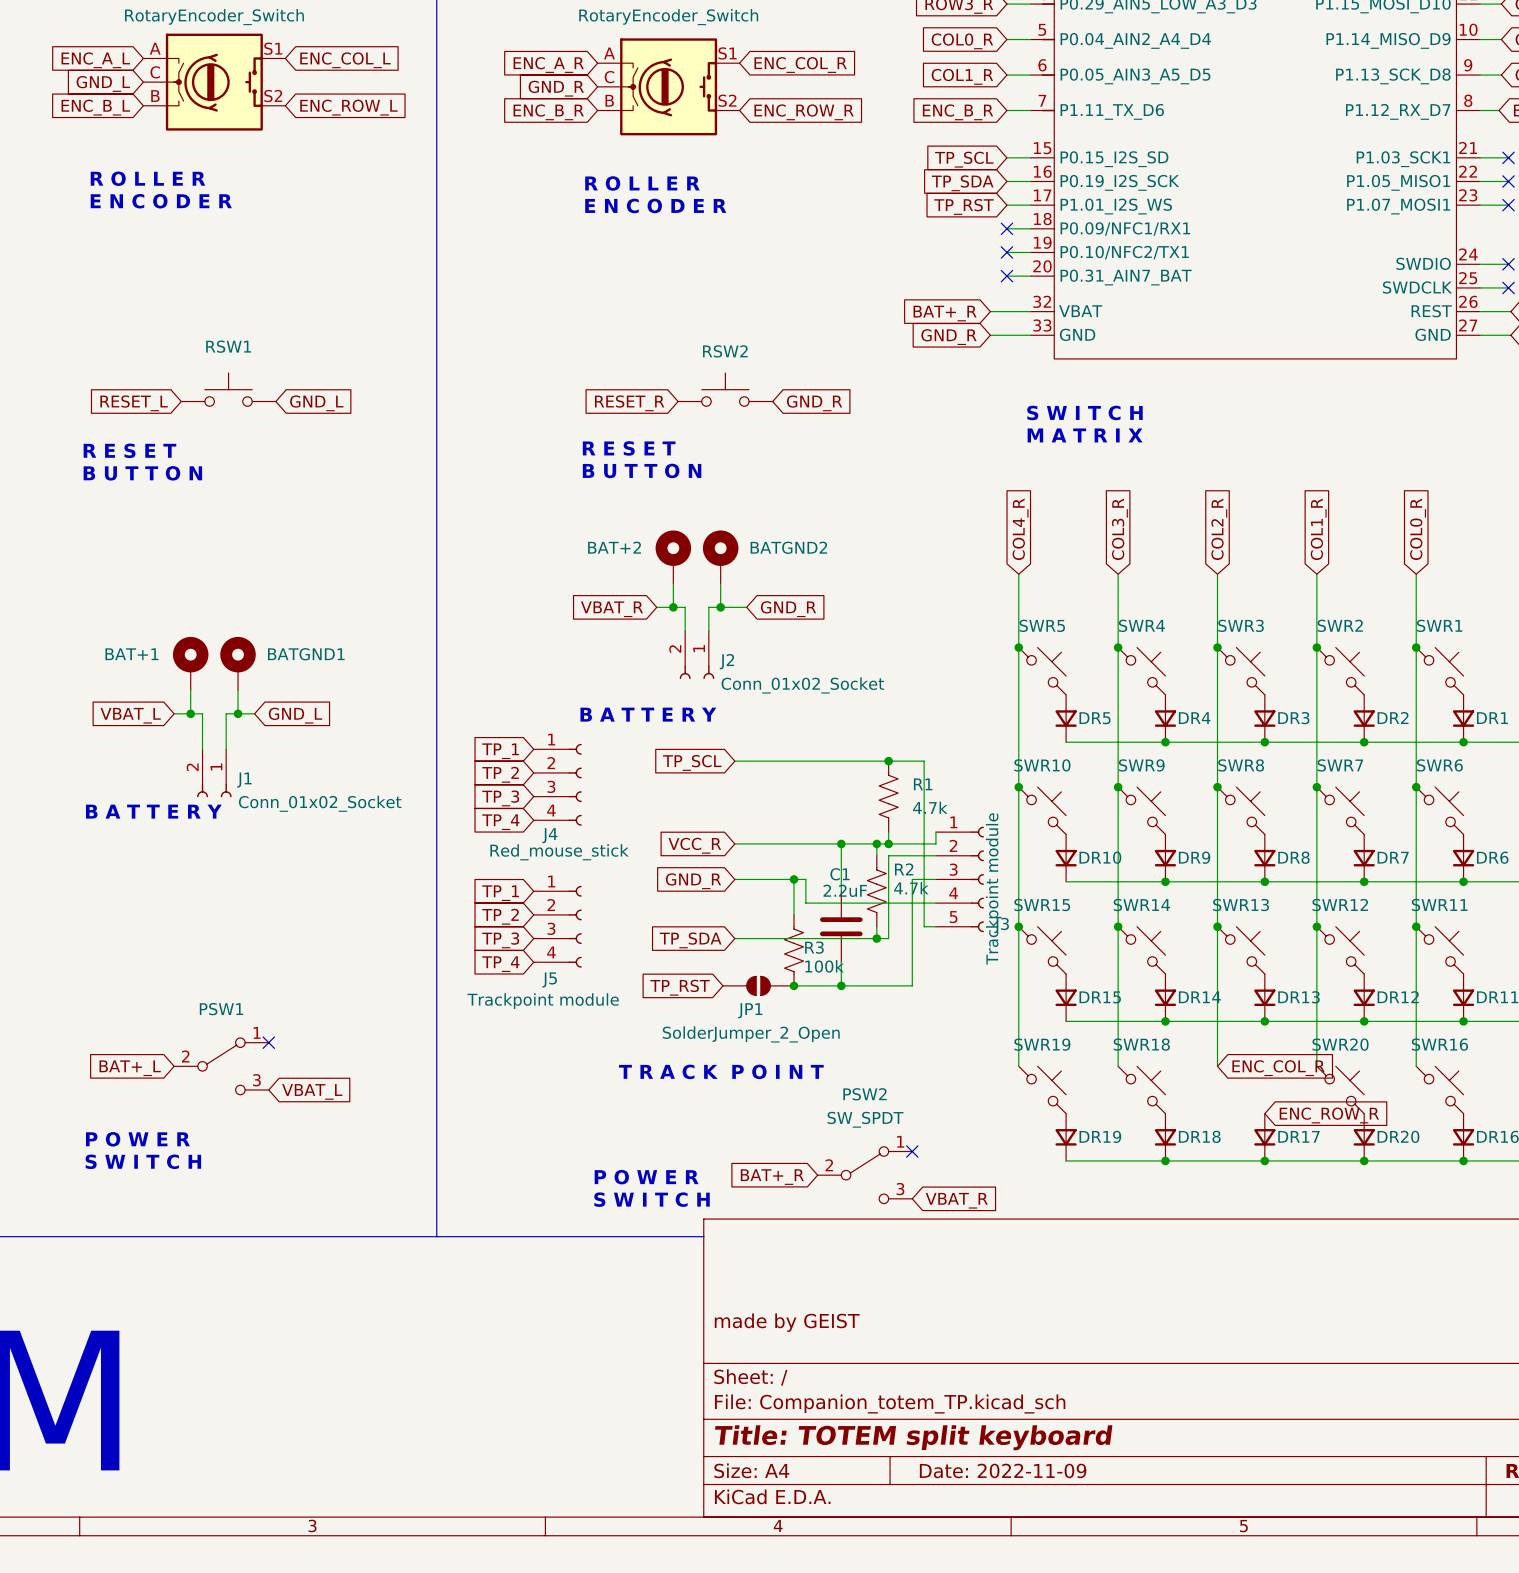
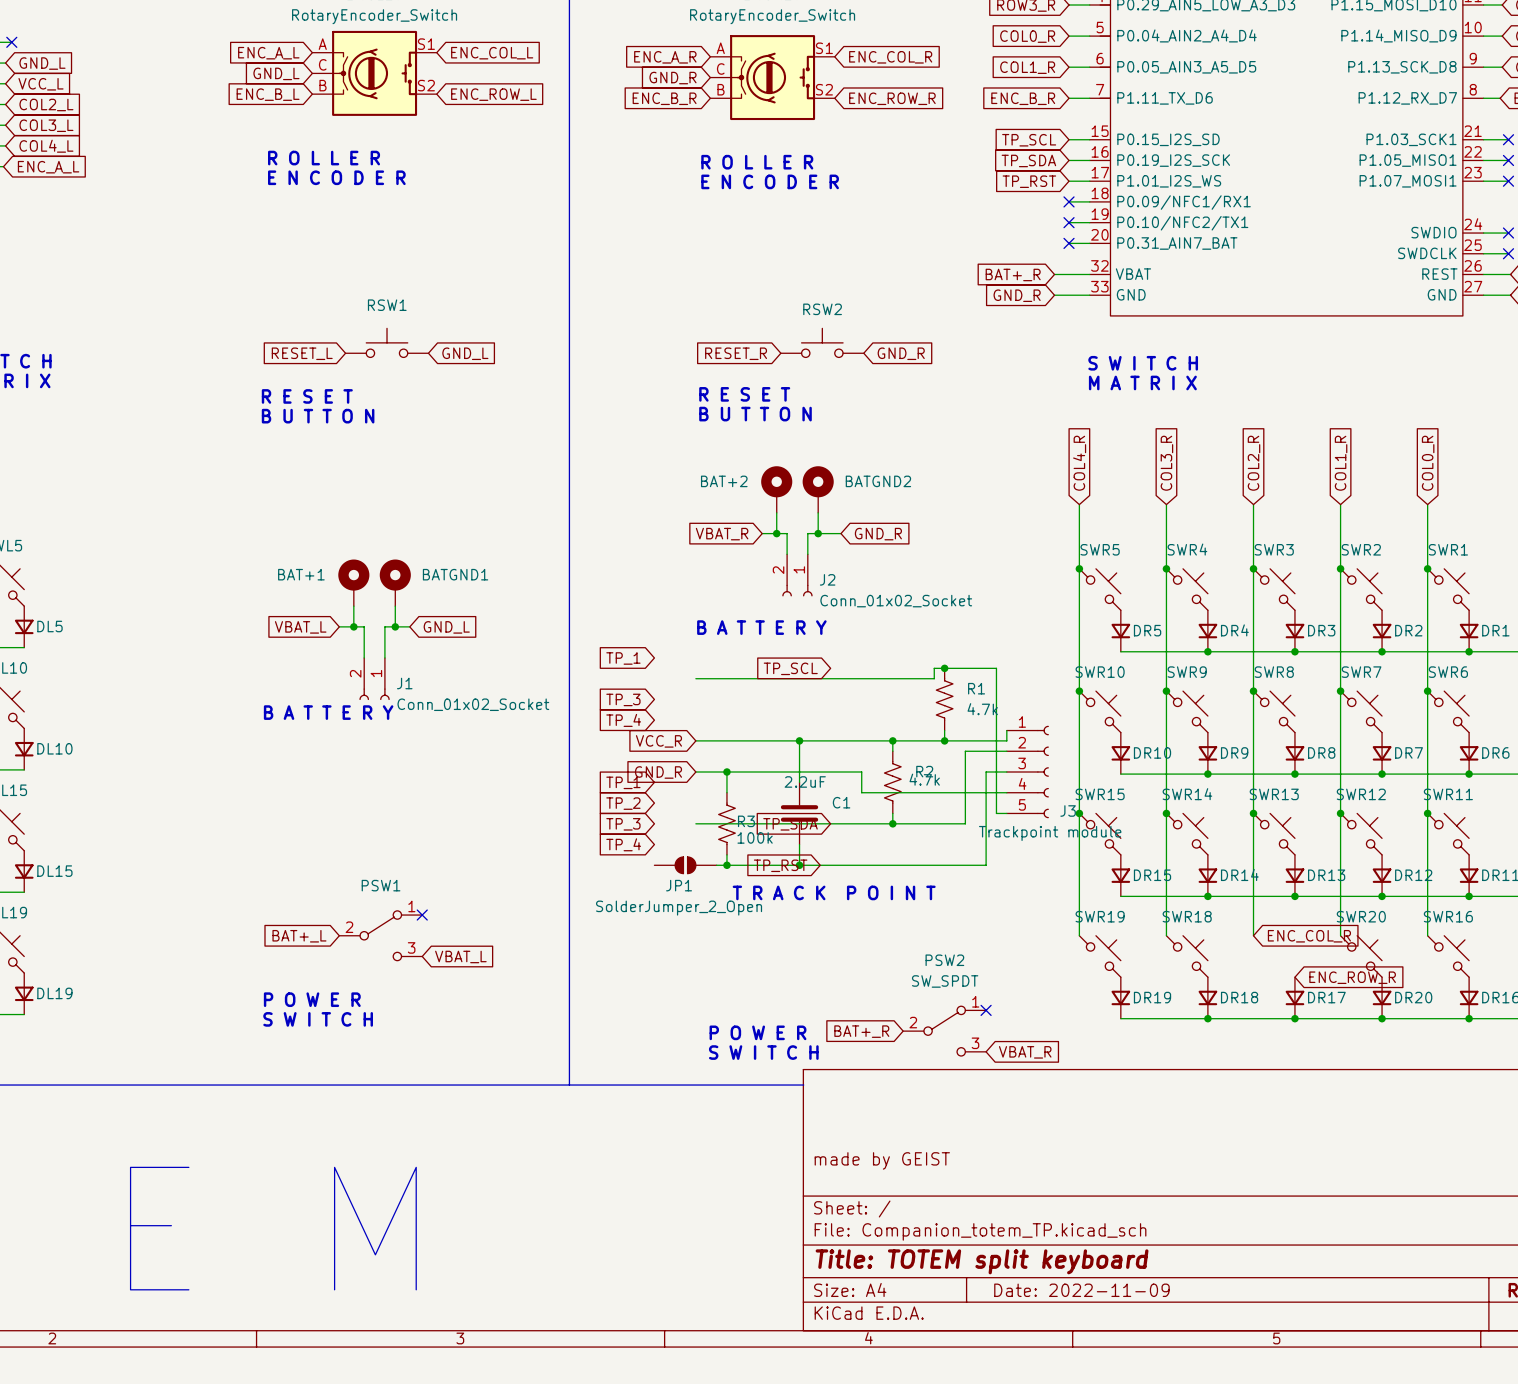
wire: (734, 761) (853, 761) -> (695, 678) (934, 678) (934, 668)
junction position: (888, 761) -> (944, 668)
global label: TP_2 (500, 774) -> none
J4: Red_mouse_stick (557, 784) -> none
R1 position: (888, 796) -> (944, 699)
wire: (888, 832) (888, 843) -> (944, 730) (944, 740)
wire: none -> (695, 740) (830, 740)
junction: none -> (799, 740)
junction: none -> (892, 740)
wire: (841, 843) (841, 891) -> (799, 740) (799, 782)
junction: (841, 843) -> none
junction: none -> (944, 740)
wire: (876, 843) (876, 855) -> (892, 740) (892, 751)
junction: (876, 843) -> none
junction: (888, 843) -> none
global label position: VCC_R (694, 845) -> VCC_R (658, 741)
R2 name position: R2 (904, 869) -> R2 (924, 771)
C1 name position: C1 (840, 874) -> C1 (841, 802)
wire: none -> (695, 772) (830, 772)
wire: none -> (726, 772) (726, 792)
junction: none -> (726, 772)
wire: (770, 879) (805, 879) (805, 903) -> (861, 772) (861, 792) (892, 792)
wire: (794, 879) (794, 914) -> none
junction: (794, 879) -> none
global label position: GND_R (693, 881) -> GND_R (658, 772)
J3 value rotation: 0° (993, 888) -> 90° clockwise (1050, 833)
R2 position: (876, 891) -> (892, 782)
J5: Trackpoint module (557, 926) -> none
C1 position: (841, 926) -> (799, 813)
wire: (876, 926) (876, 938) -> (892, 813) (892, 823)
wire: none -> (695, 823) (830, 823)
junction: none -> (892, 823)
junction: (876, 938) -> none
R3 position: (794, 950) -> (726, 823)
wire: (841, 962) (841, 985) -> (799, 844) (799, 865)
wire: none -> (726, 854) (726, 865)
wire: none -> (716, 865) (882, 865)
junction: none -> (726, 865)
junction: none -> (799, 865)
JP1 position: (758, 985) -> (685, 865)
junction: (794, 985) -> none
junction: (841, 985) -> none
text position: T R A C K P O I N T (721, 1071) -> T R A C K P O I N T (834, 892)

